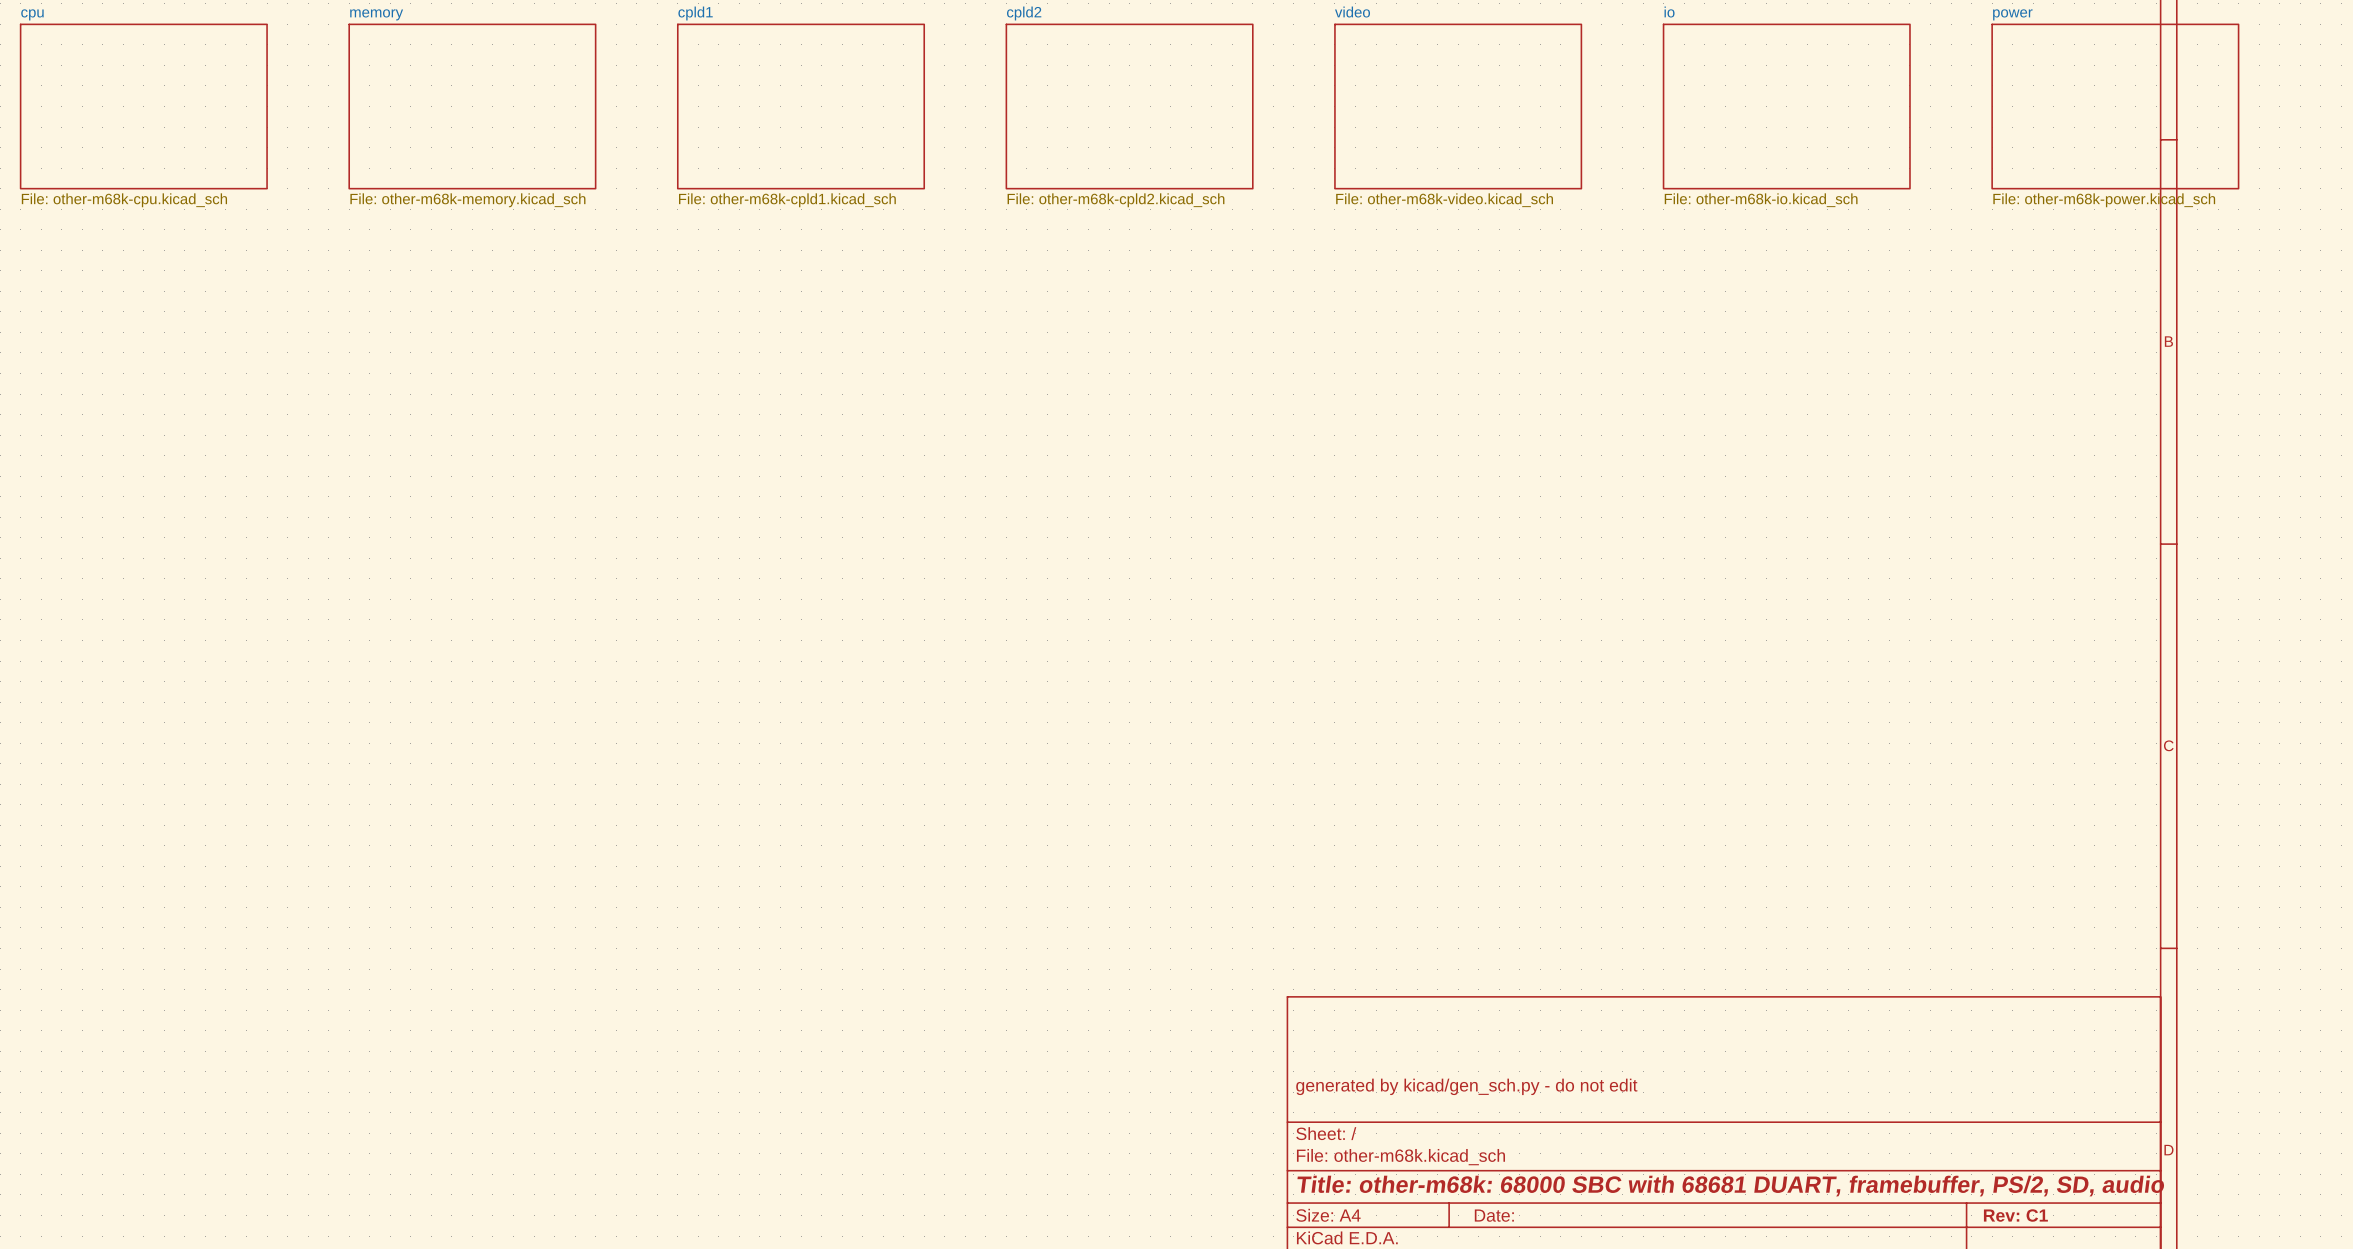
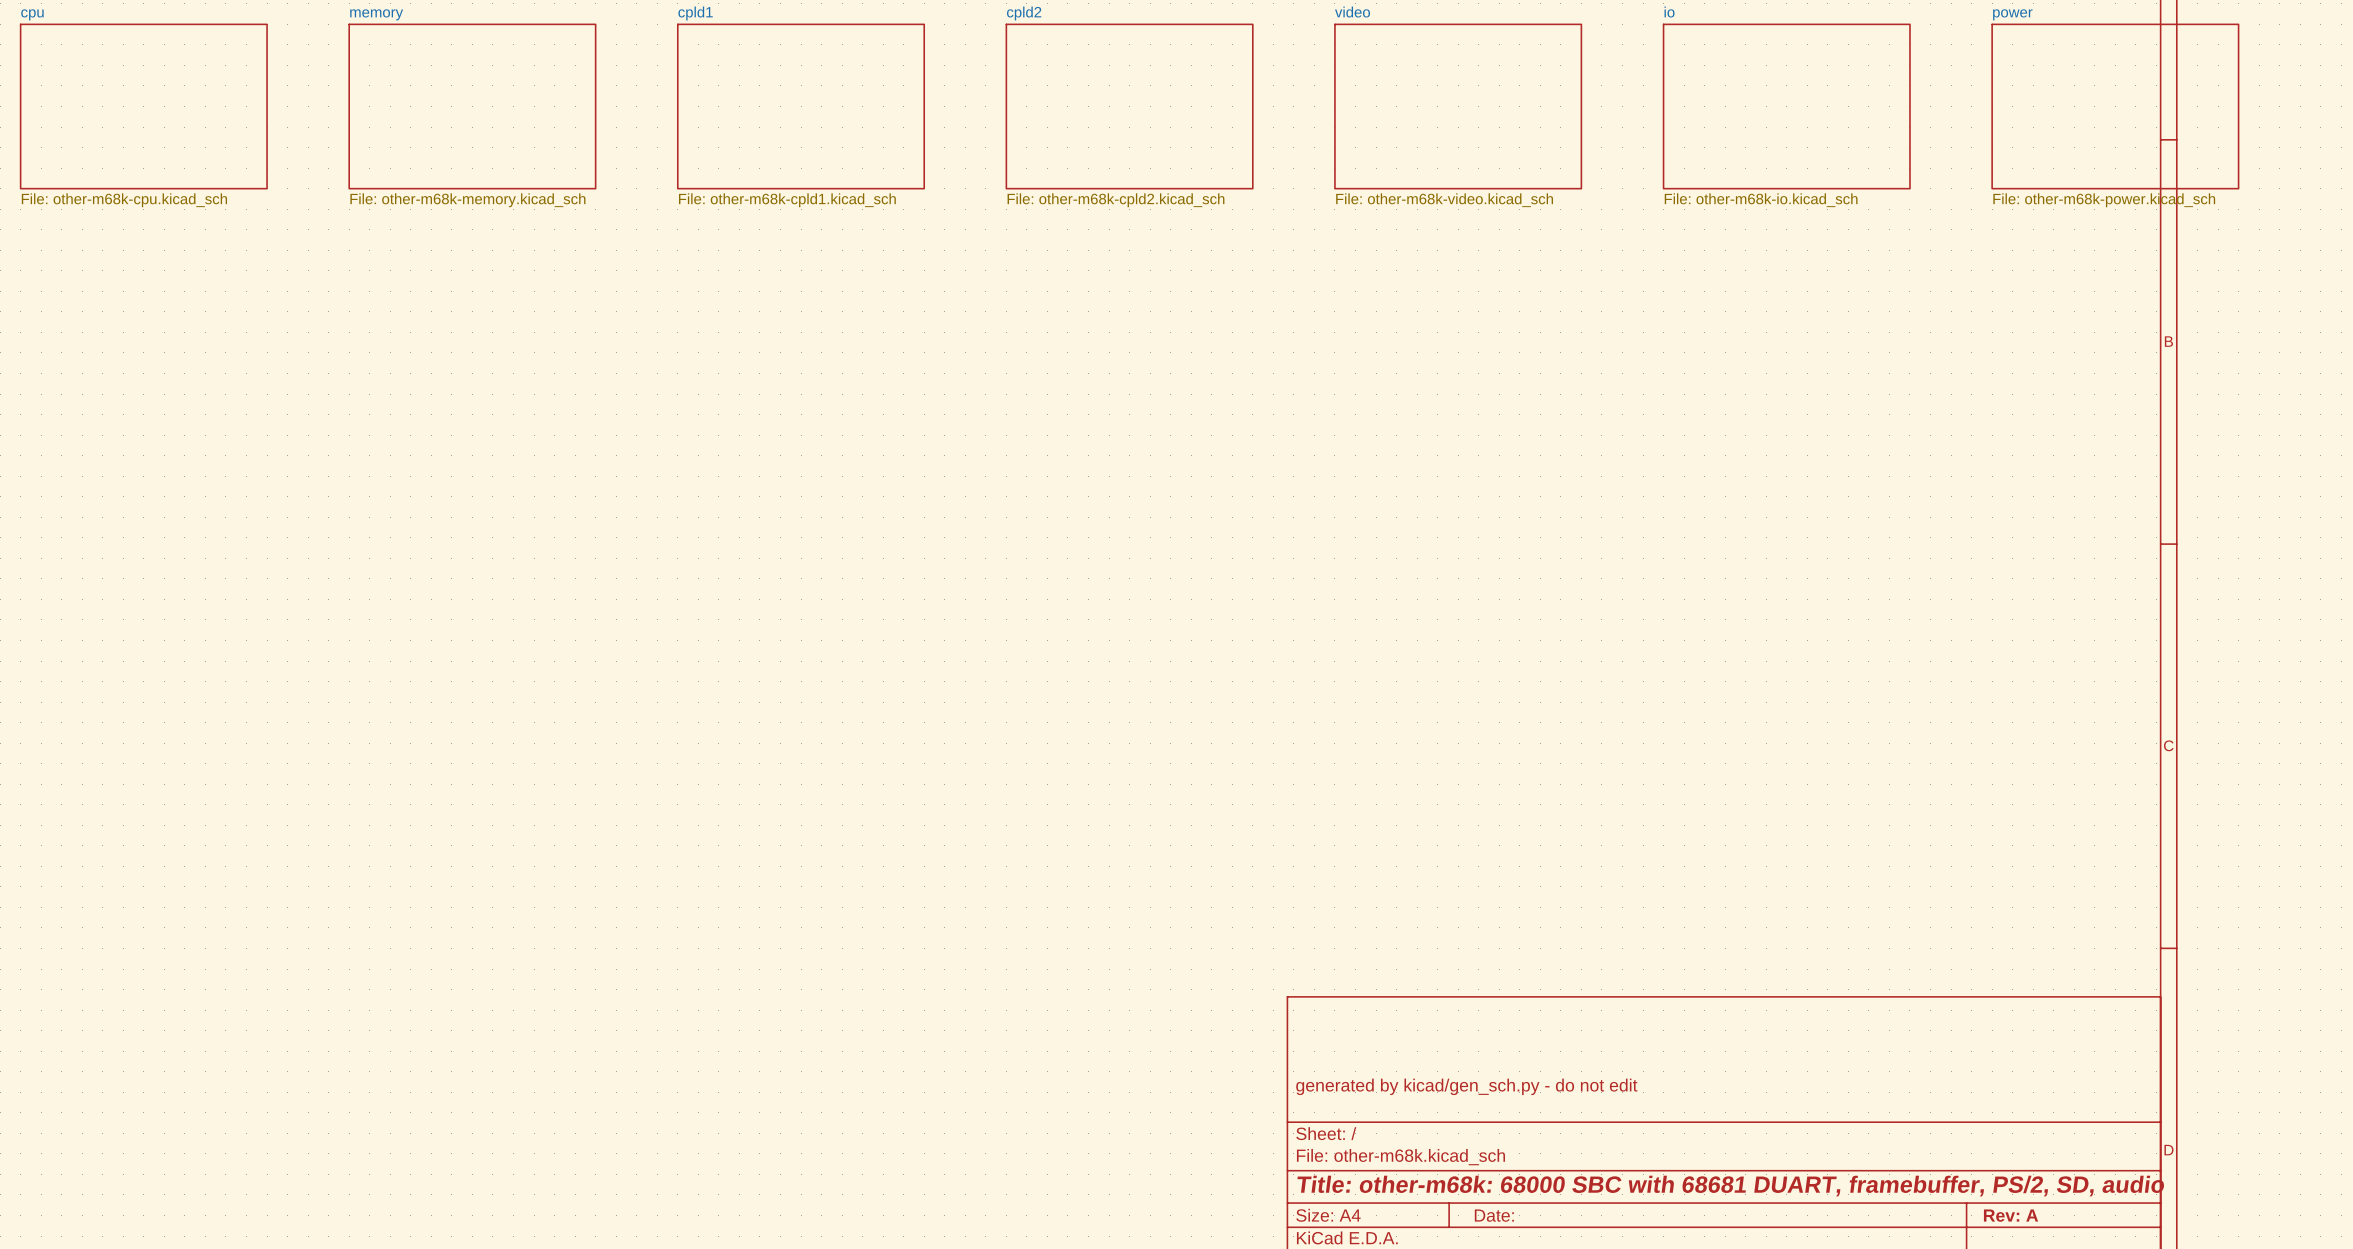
title block: Rev: C1 (2015, 1215) -> Rev: A (2011, 1215)

